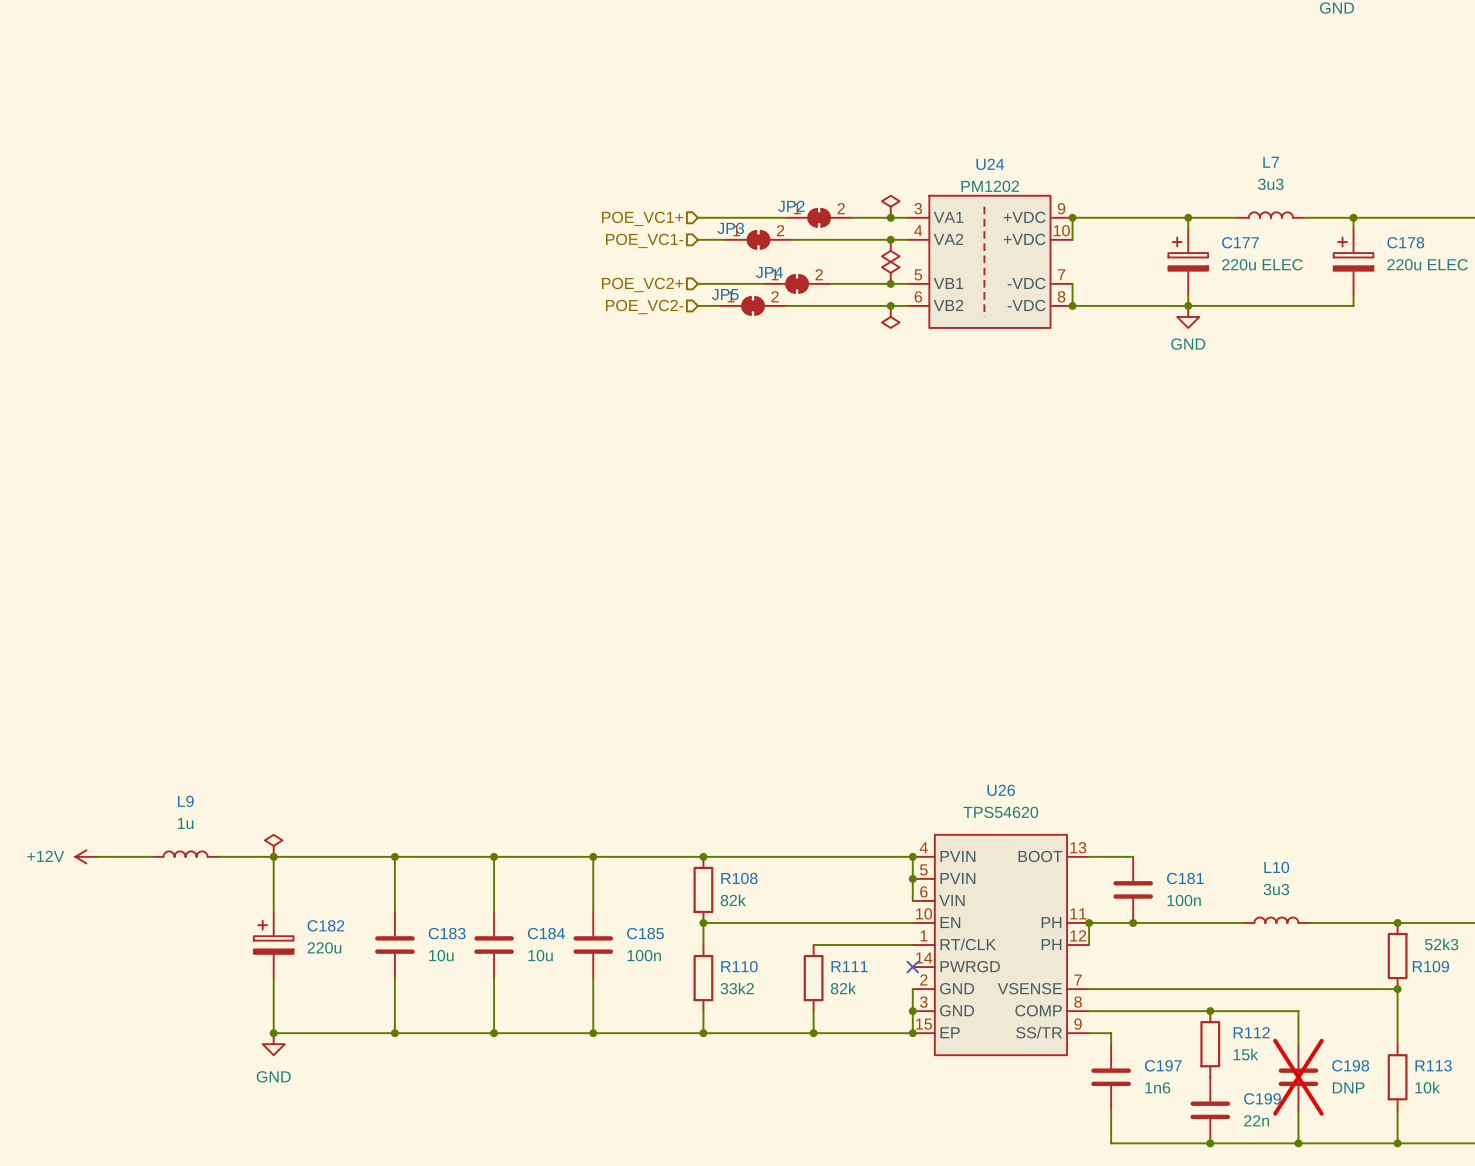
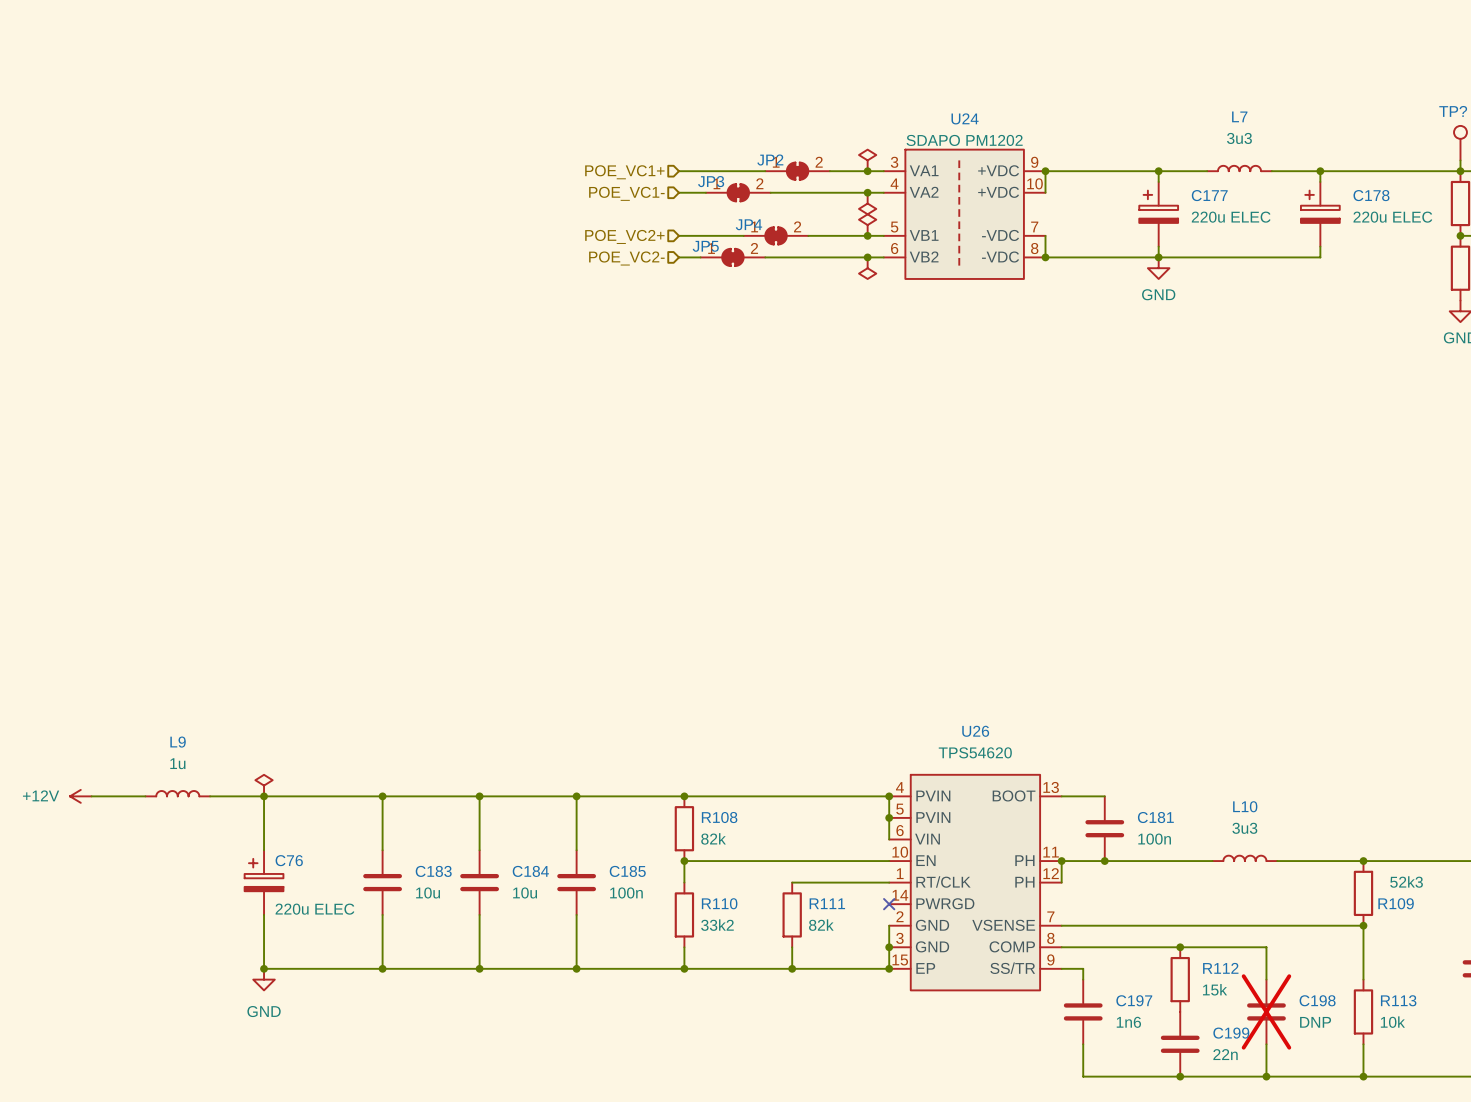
U24 value: PM1202 (990, 186) -> SDAPO PM1202 (964, 140)
C182 name: C182 (325, 925) -> C76 (289, 860)
C182 value: 220u (324, 947) -> 220u ELEC (314, 909)

